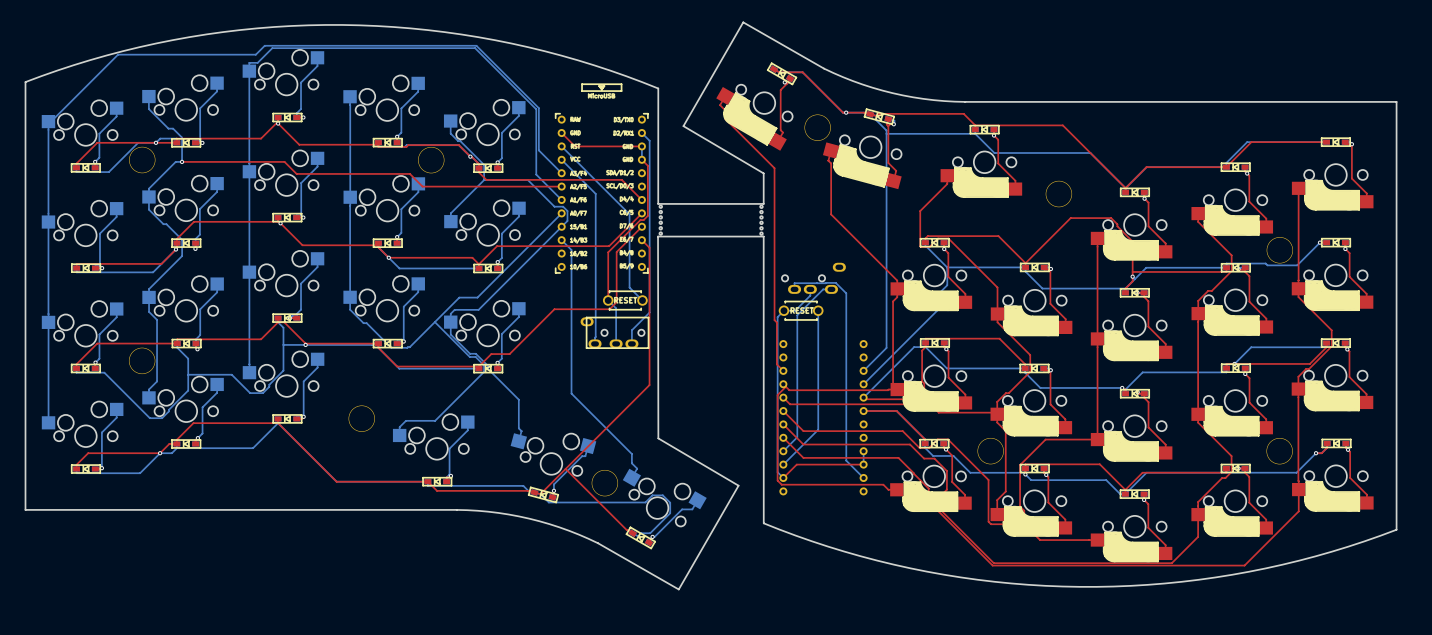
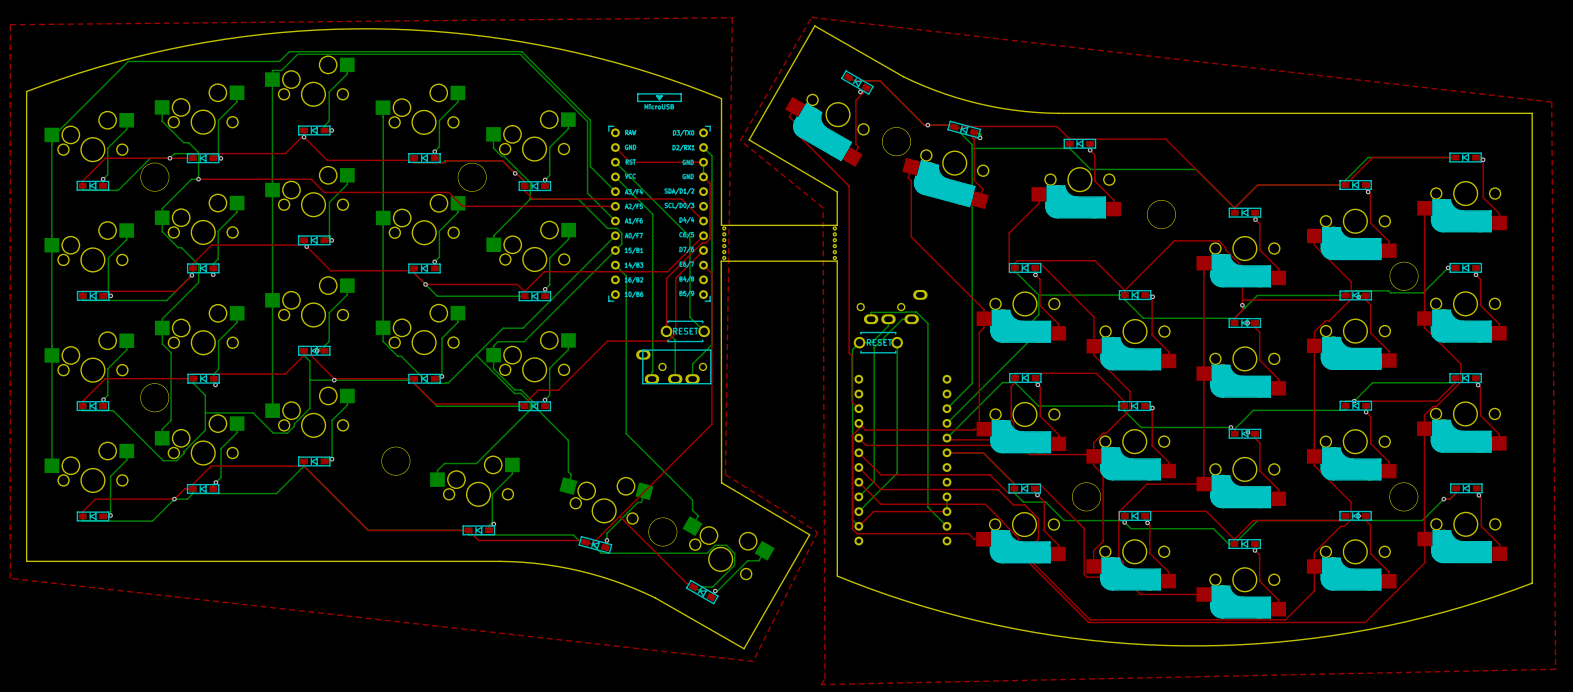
top zone outline: none -> (732, 17) (10, 24) (10, 578) (753, 661) (817, 532) (725, 474) (732, 17)
top zone outline: none -> (811, 17) (740, 140) (823, 207) (824, 678) (821, 684) (1555, 669) (1551, 102) (811, 17)

